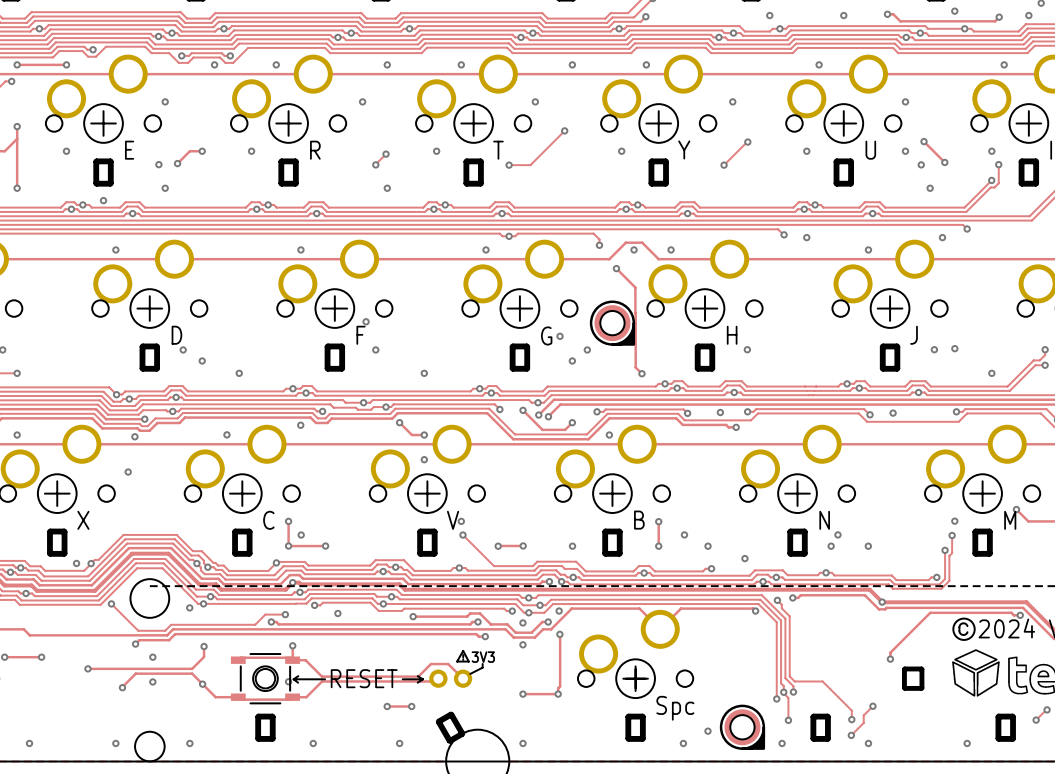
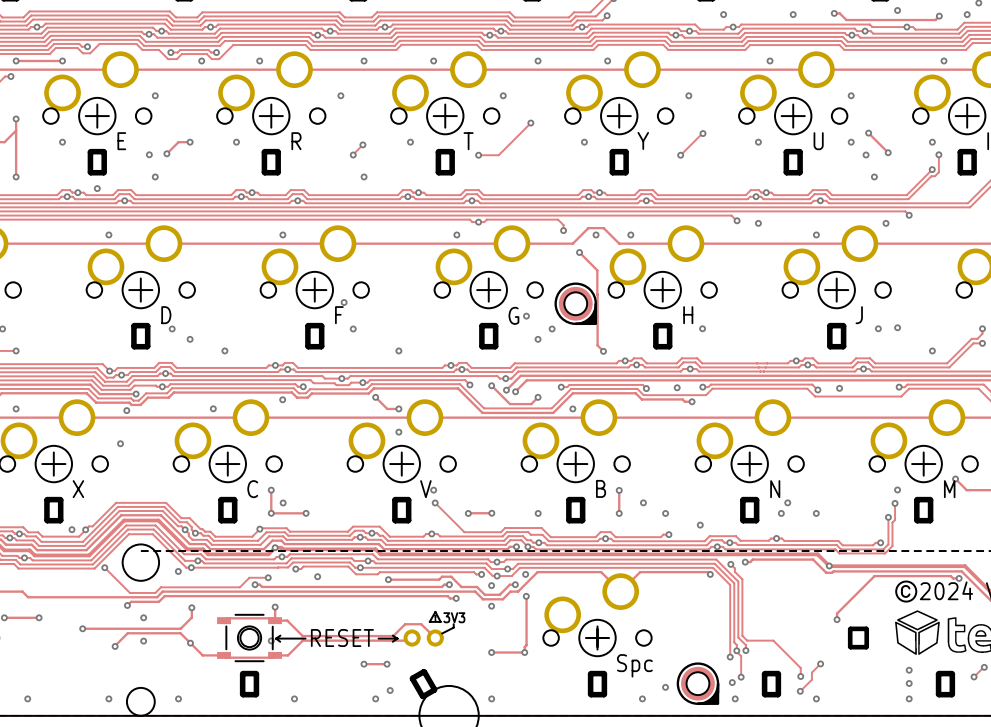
via: none -> (909, 670)
via: none -> (732, 682)
via: none -> (909, 683)
via: none -> (390, 690)

